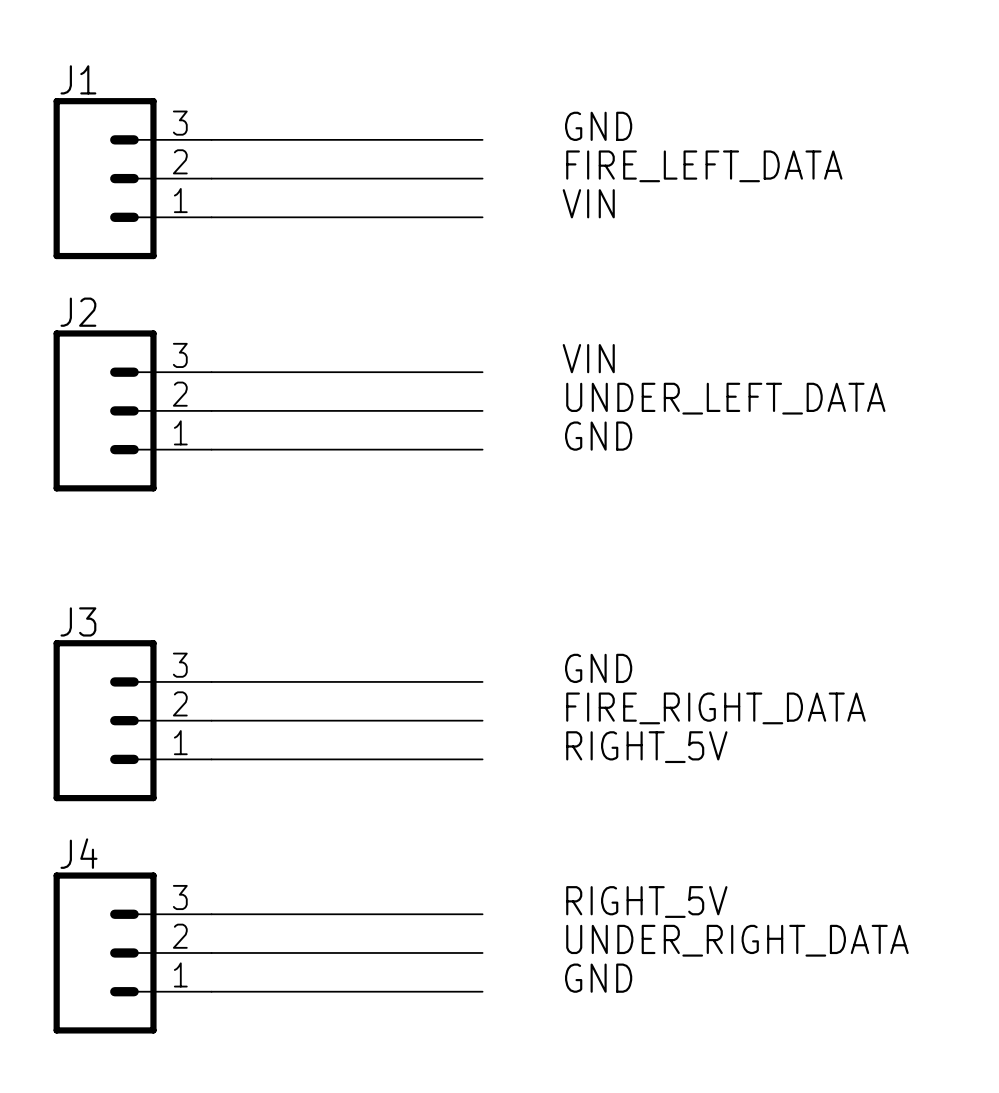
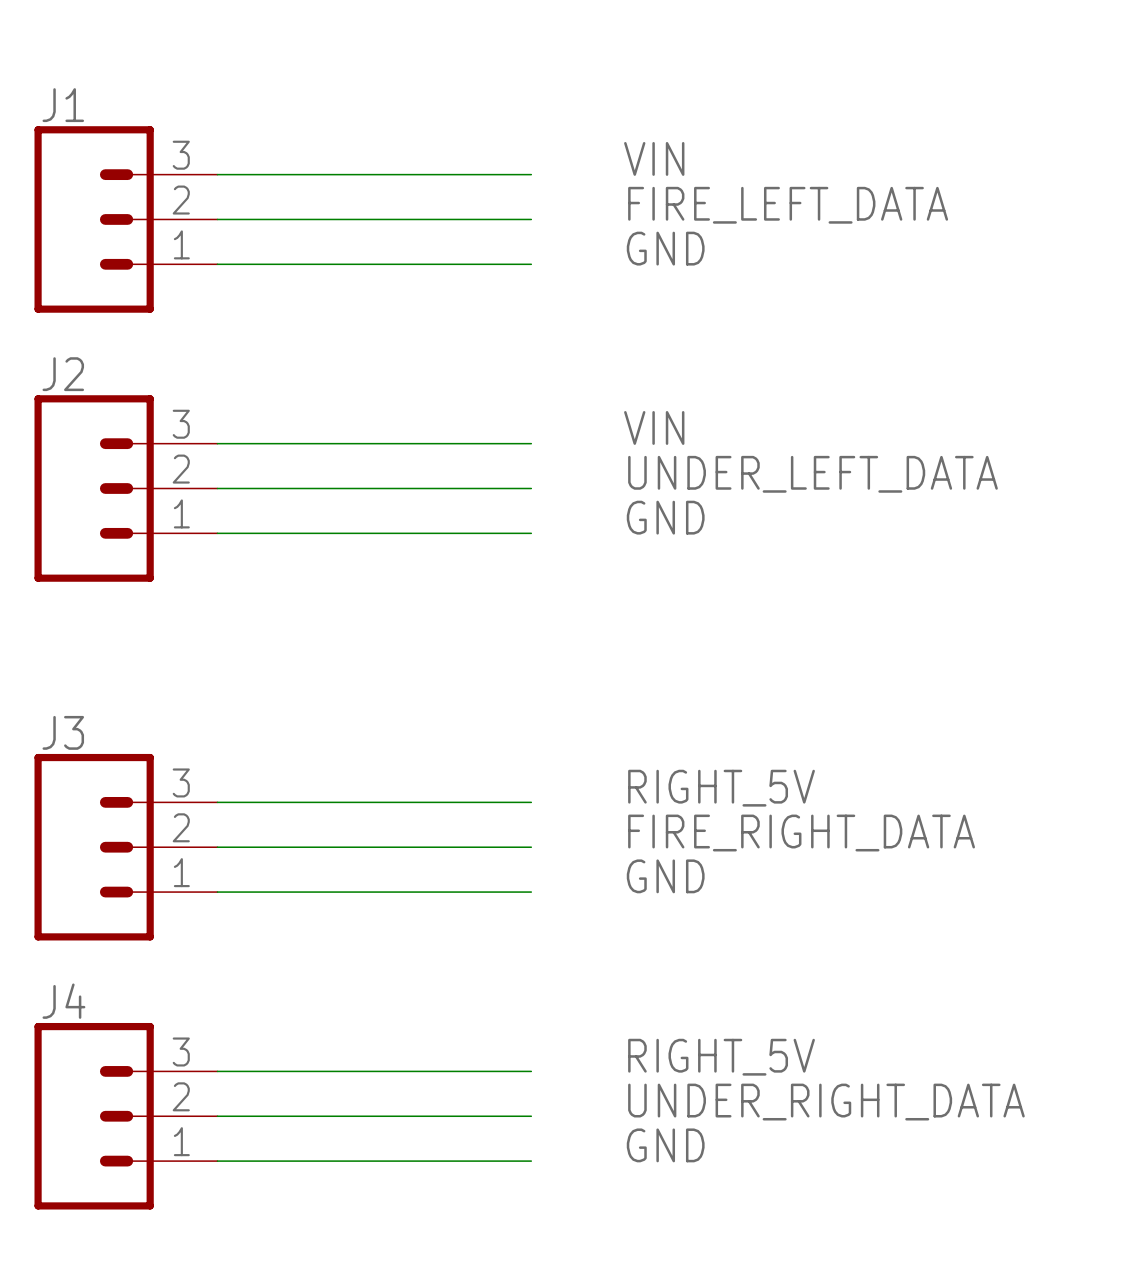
label: GND (598, 126) -> VIN (654, 158)
label: VIN (588, 203) -> GND (665, 248)
label: GND (598, 668) -> RIGHT_5V (721, 788)
label: RIGHT_5V (646, 747) -> GND (665, 876)

